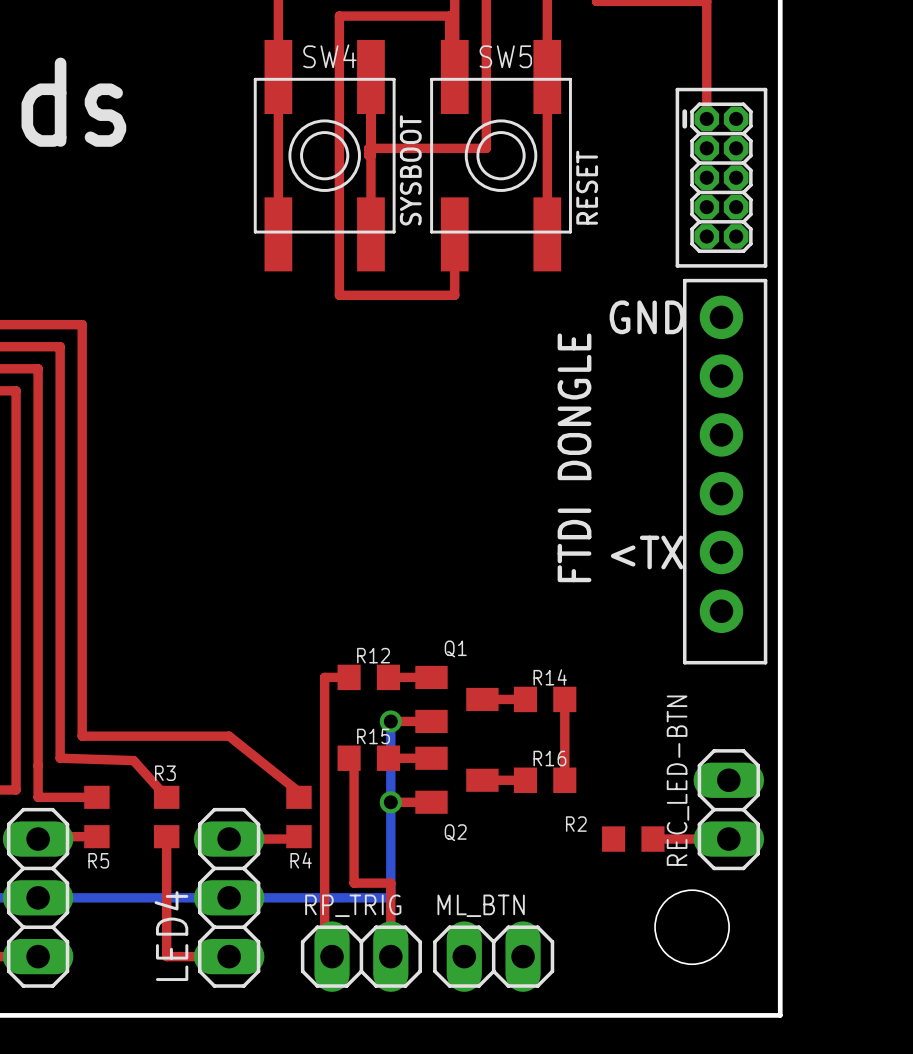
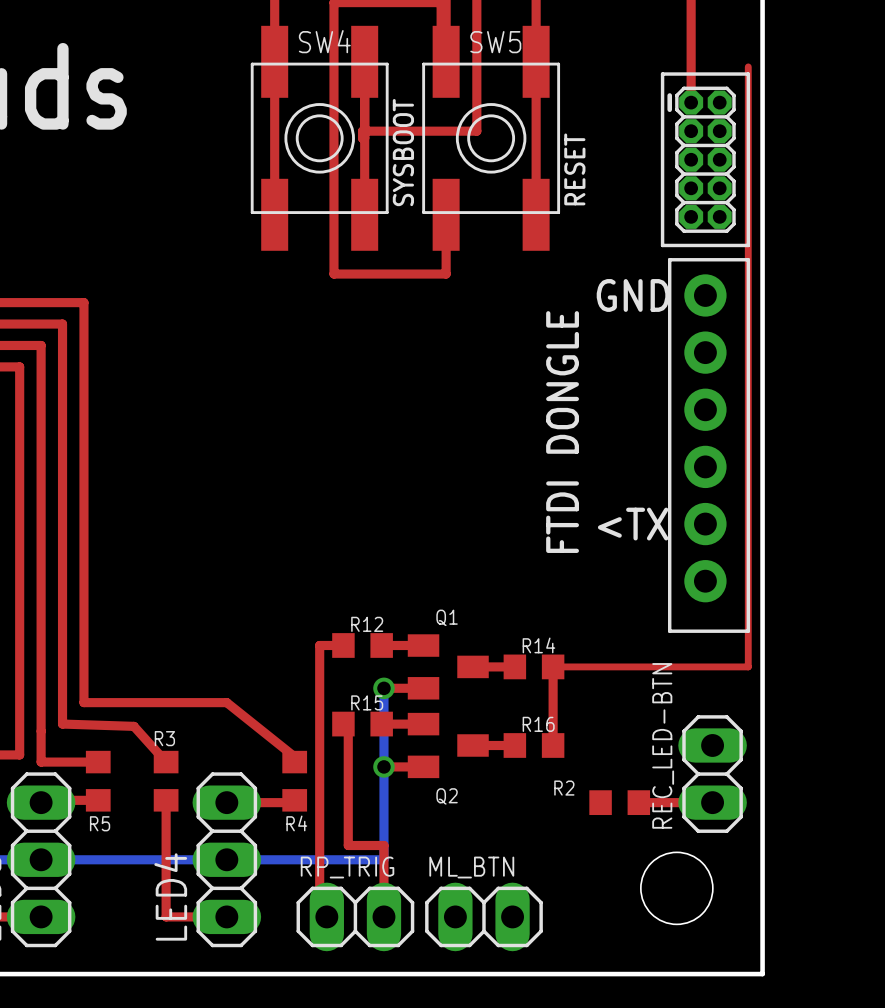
top track: none -> (748, 66) (748, 666) (553, 666)

